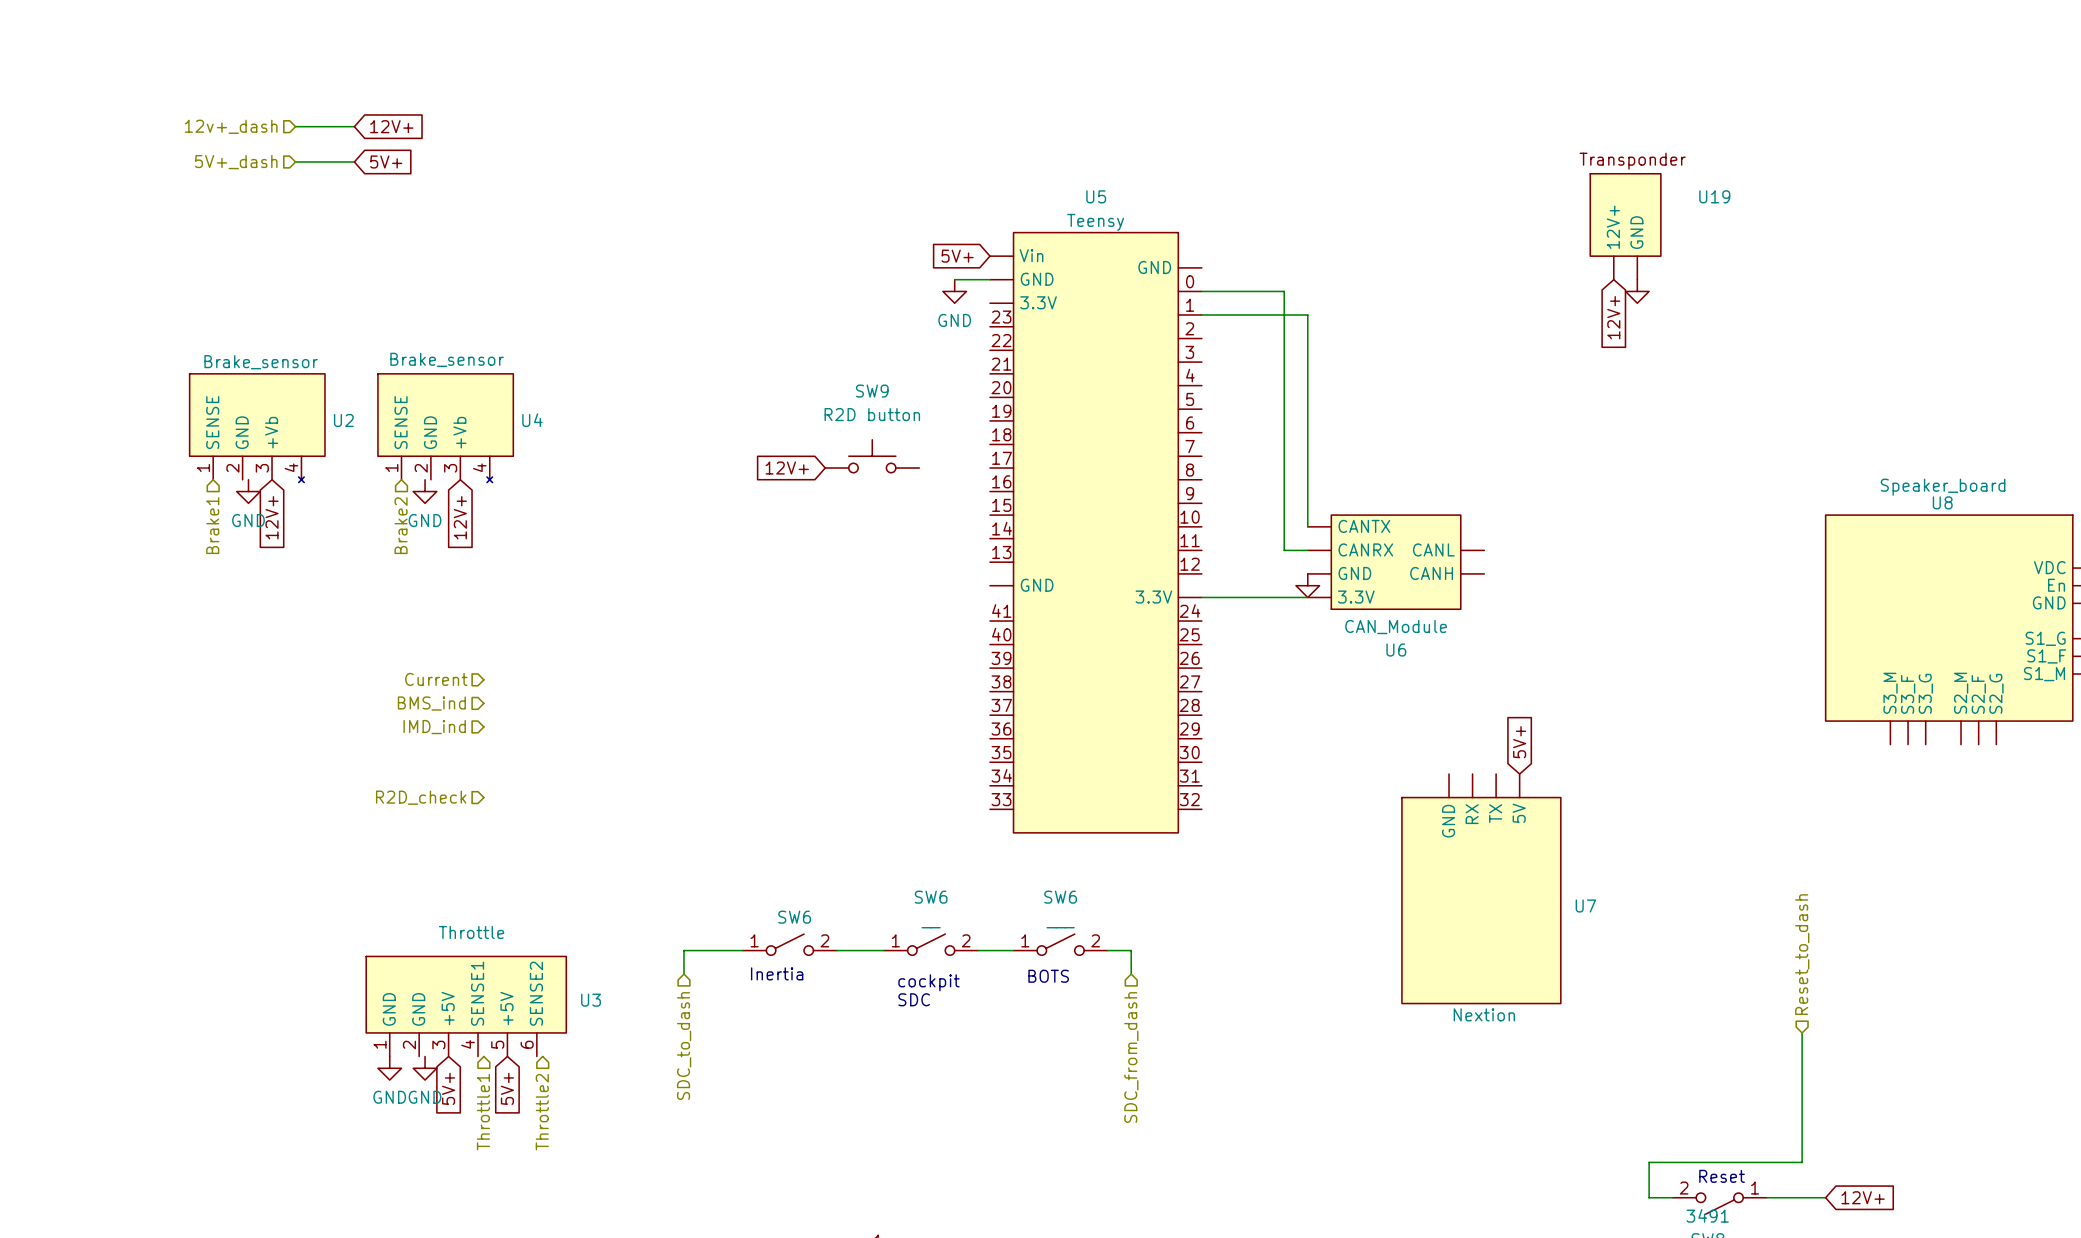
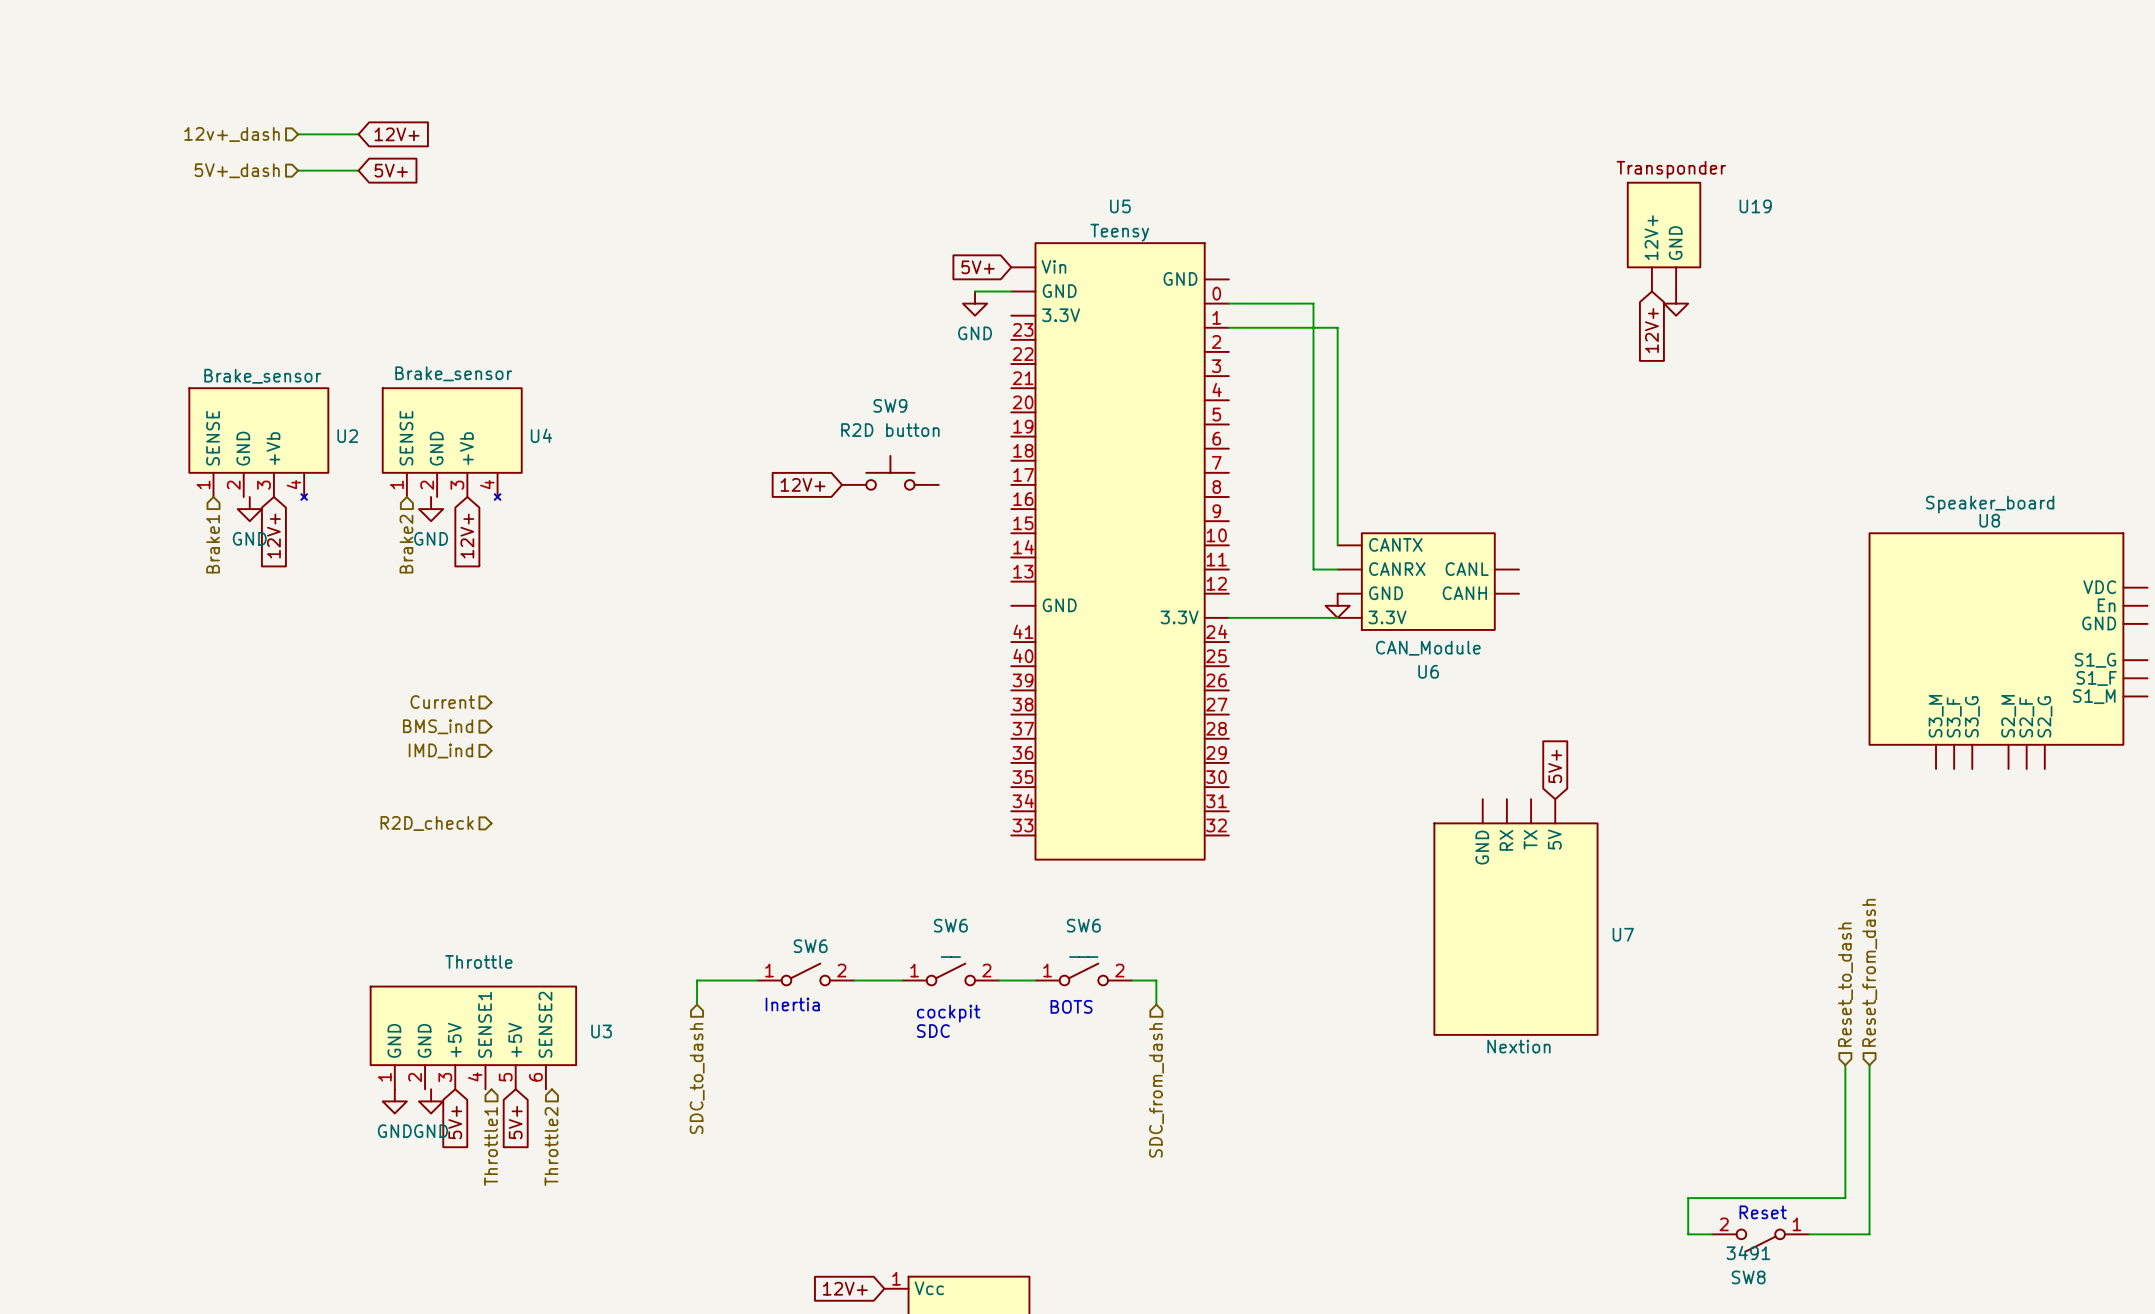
hierarchical label: none -> Reset_from_dash (1869, 972)
wire: none -> (1869, 1065) (1869, 1234)
global label: 12V+ (1863, 1197) -> none

